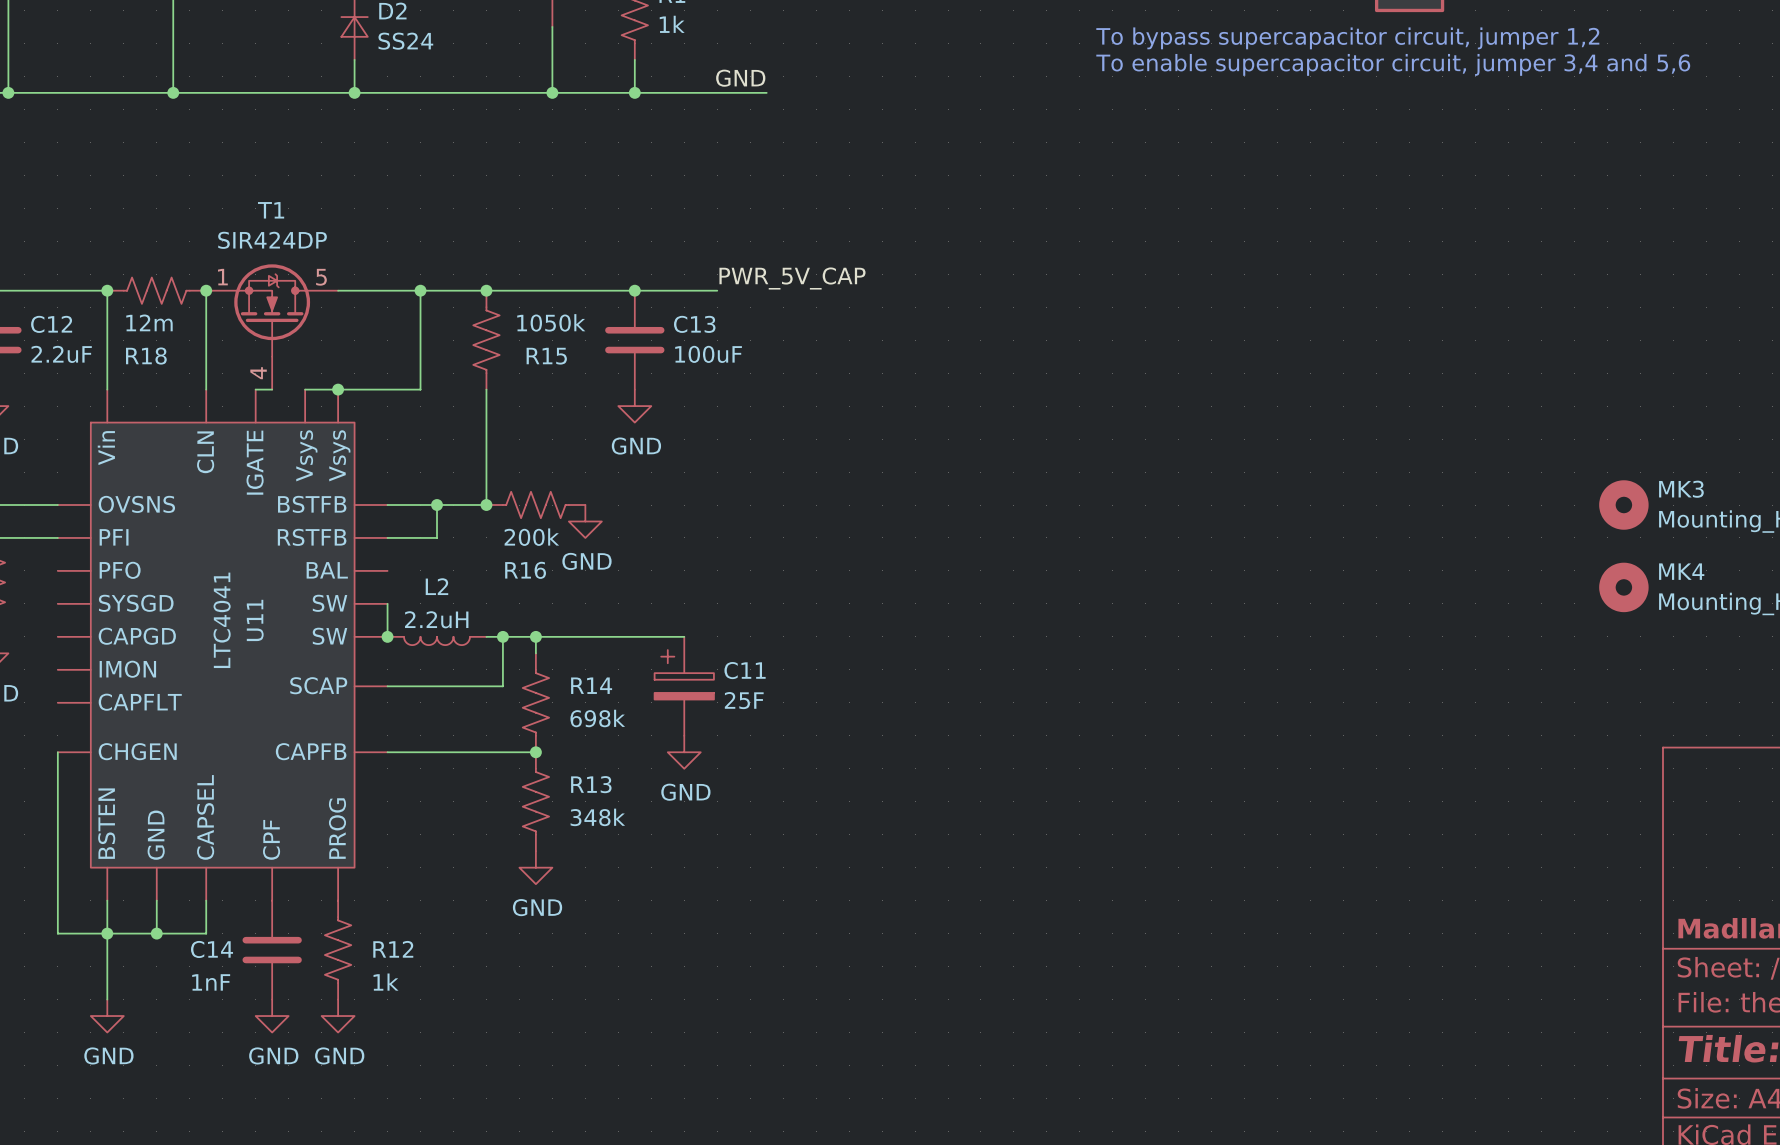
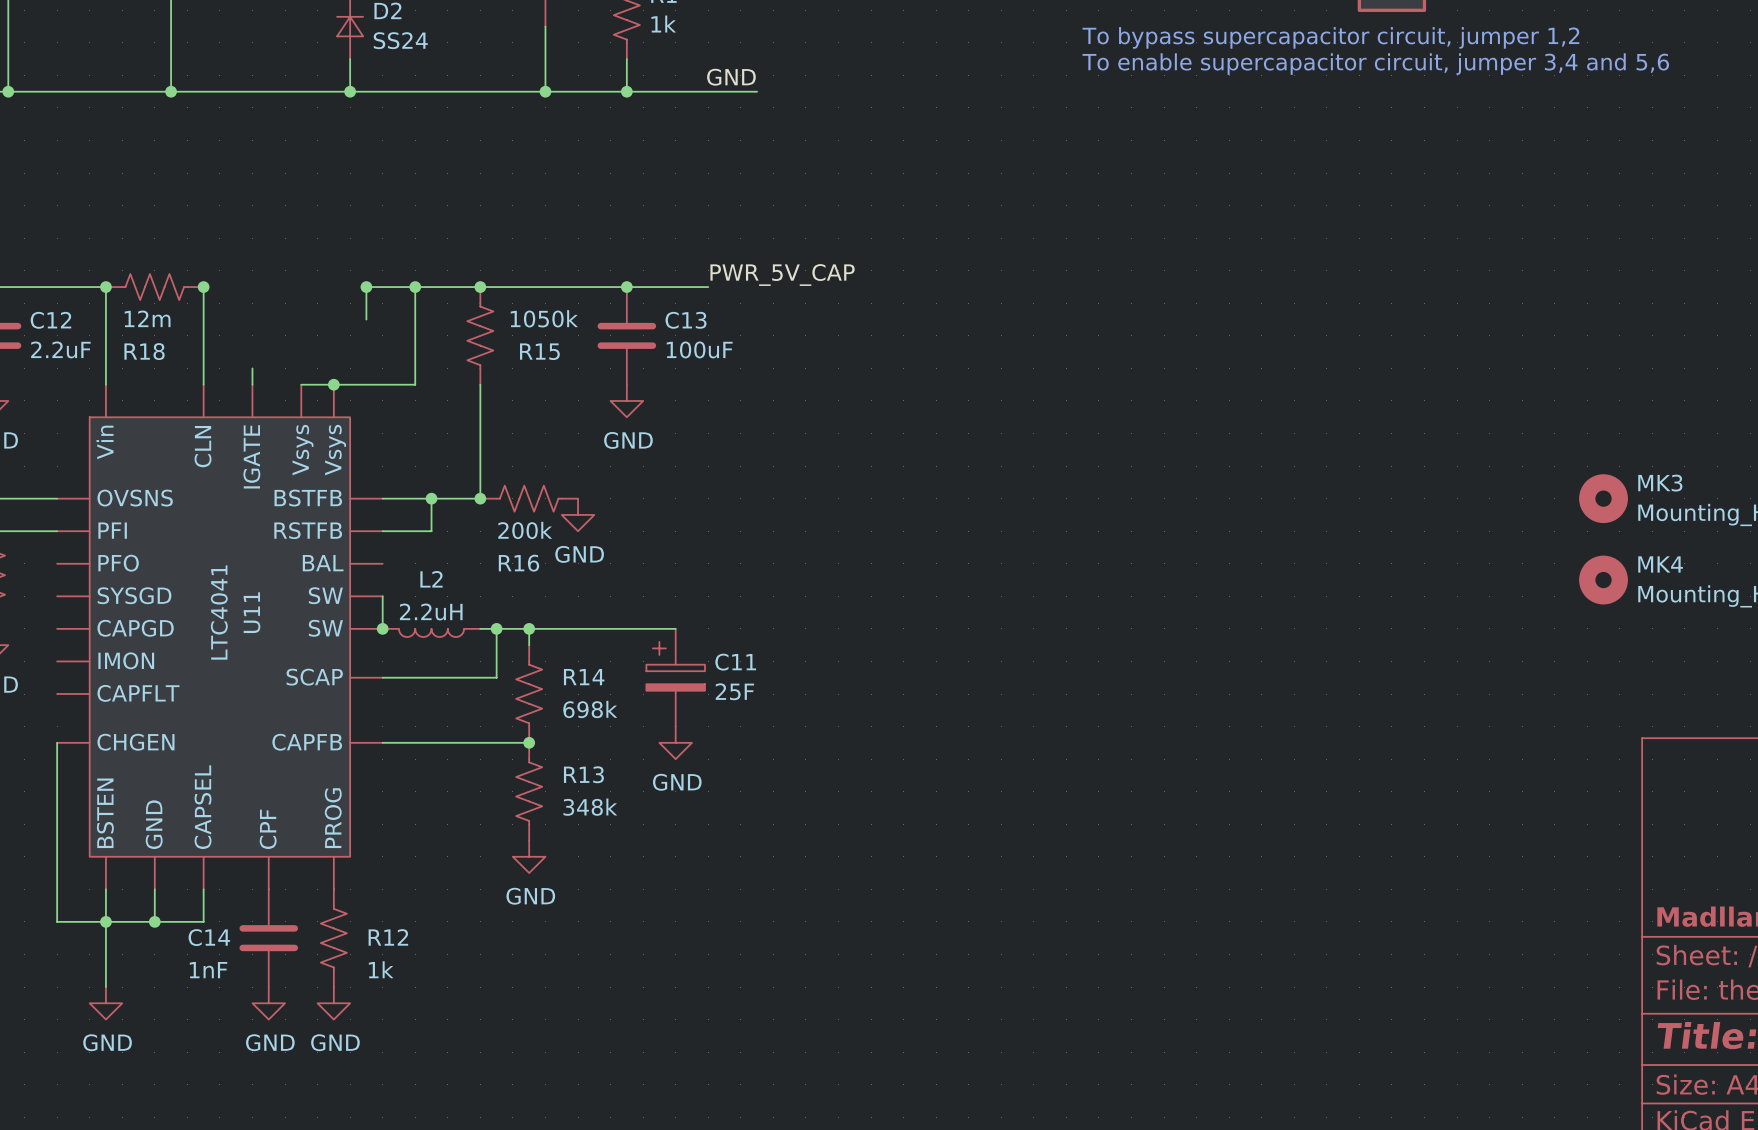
wire: (338, 290) (371, 290) -> (366, 319) (366, 287)
junction: none -> (366, 287)
T1: SIR424DP (272, 326) -> none
wire: (255, 389) (272, 389) -> (252, 384) (252, 368)

